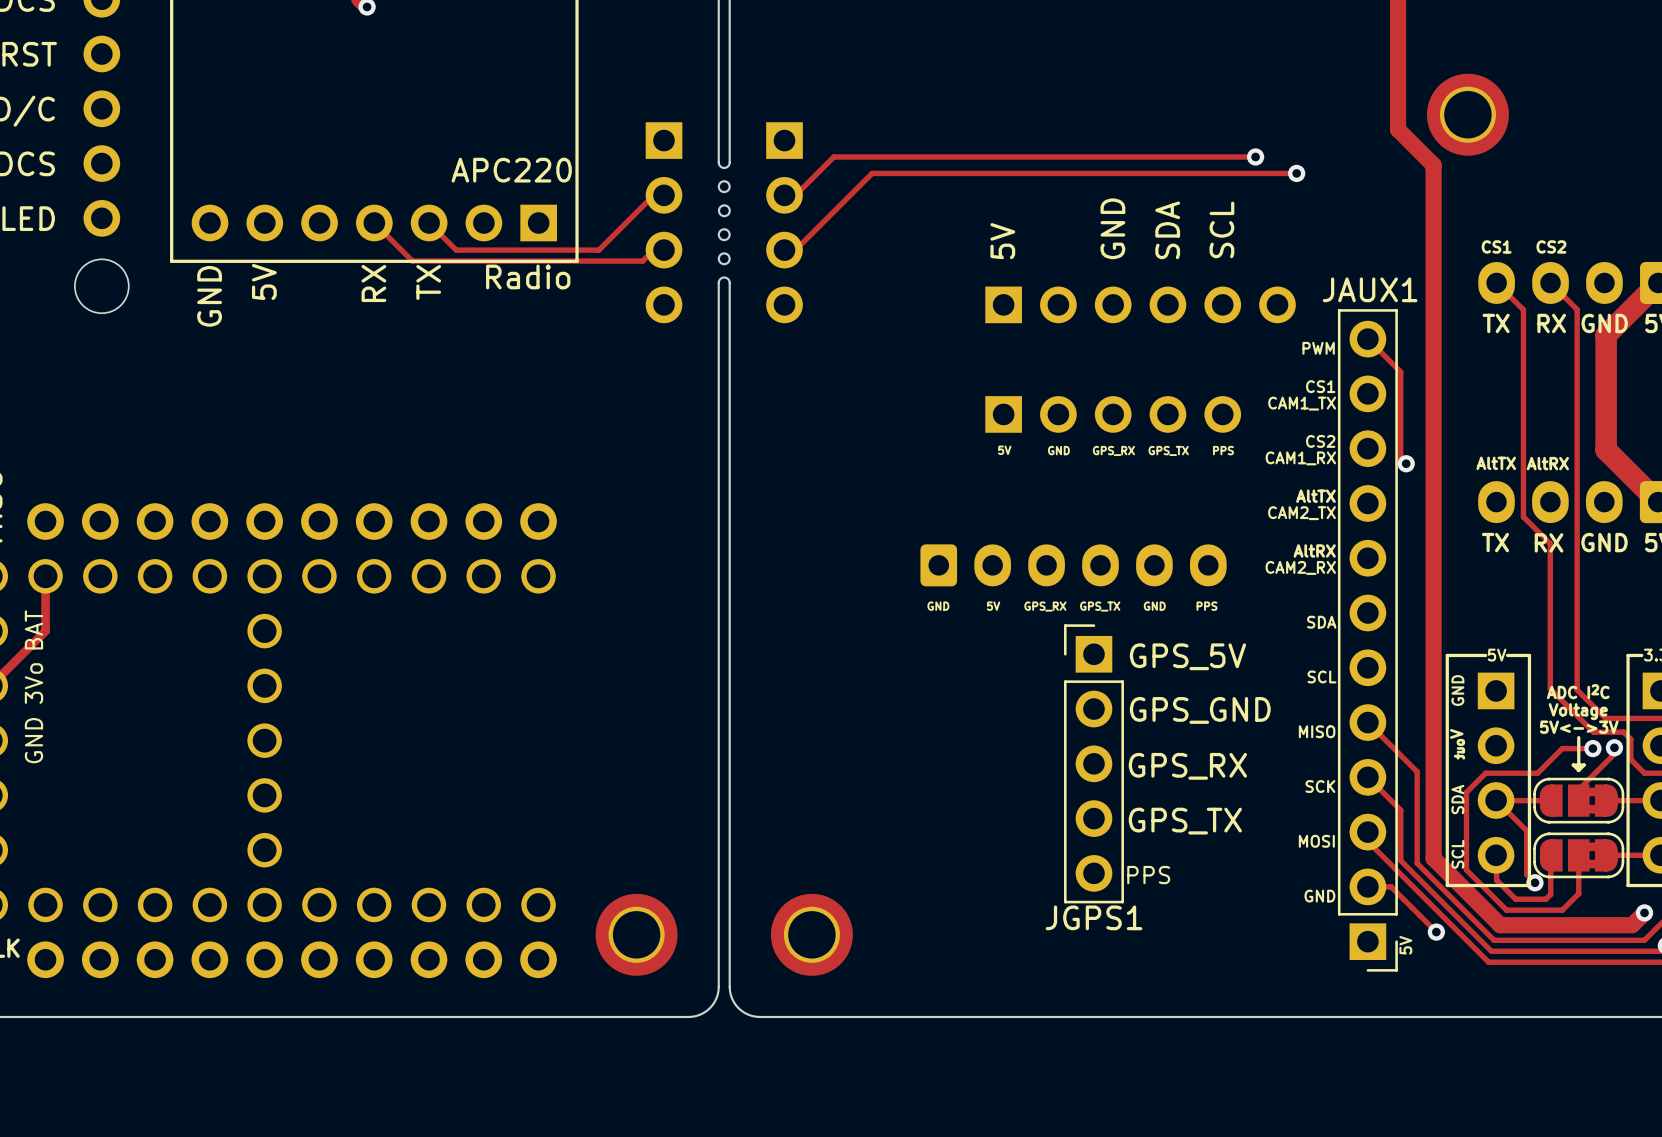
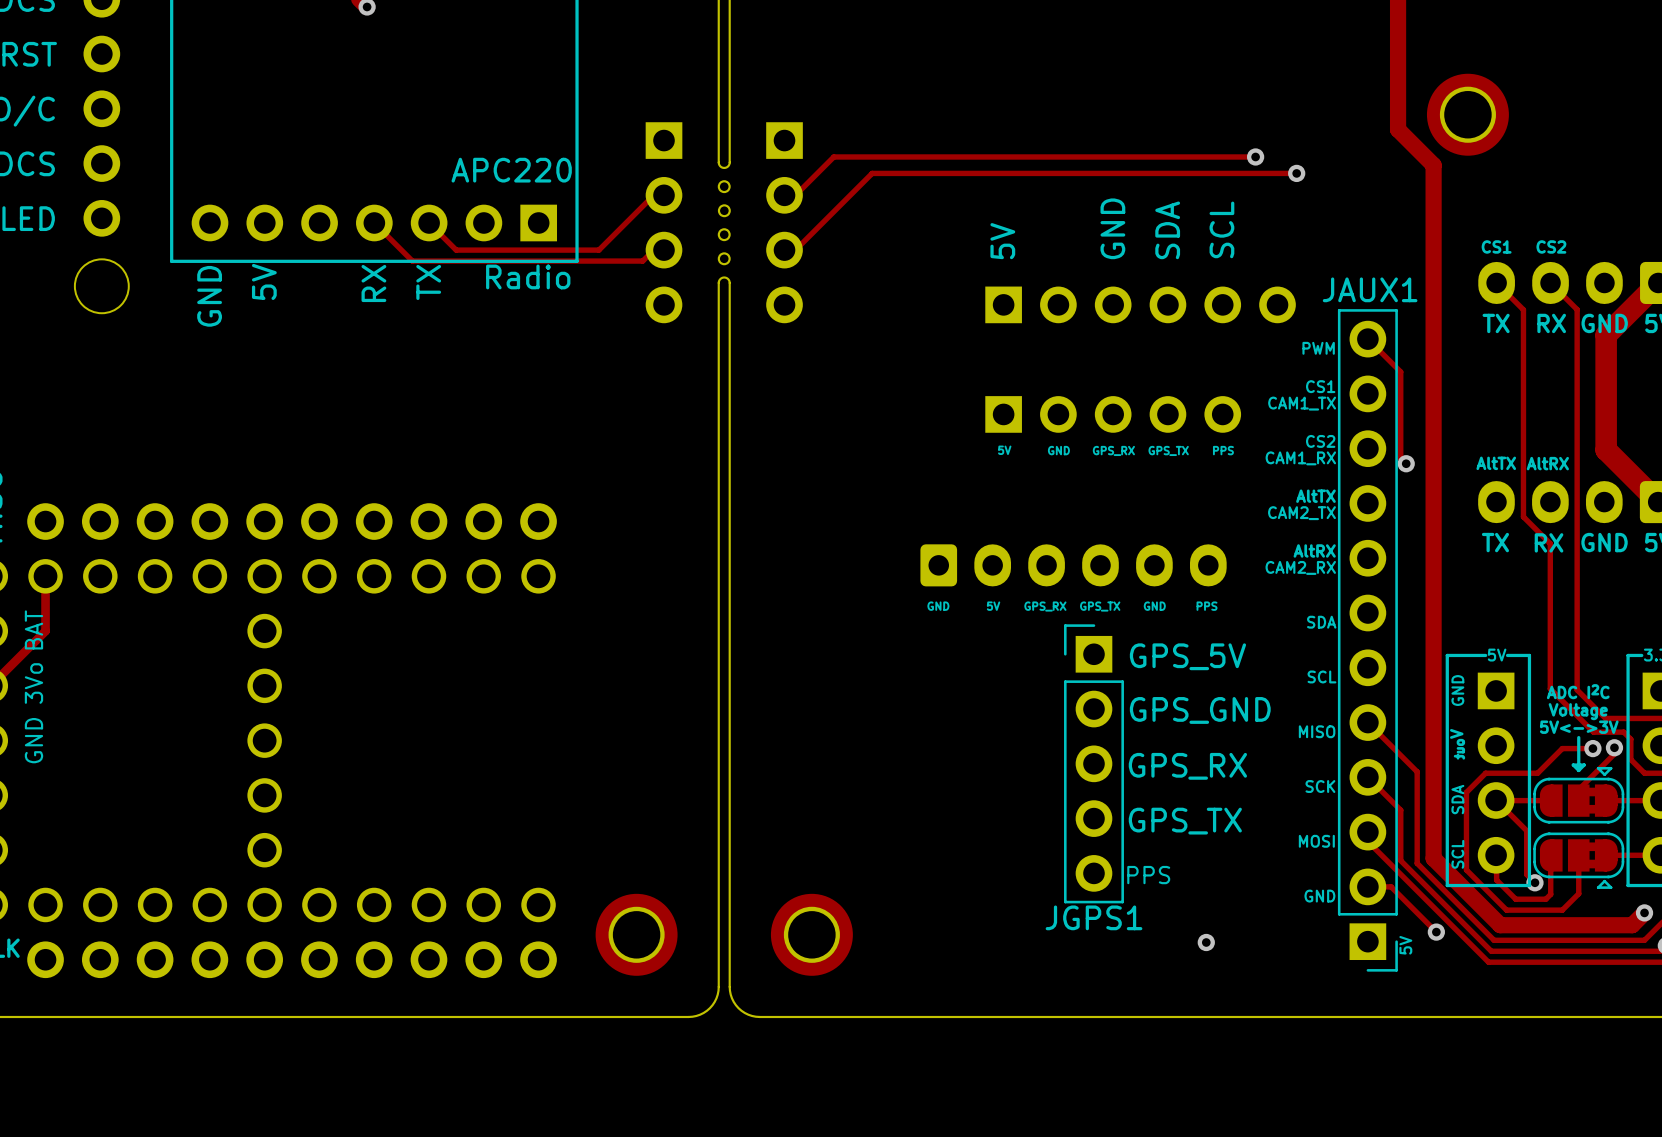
part footprint: [1533, 773, 1625, 824] -> [1533, 766, 1625, 824]
part footprint: [1533, 828, 1625, 879] -> [1533, 832, 1625, 889]
via: none -> (1206, 942)

